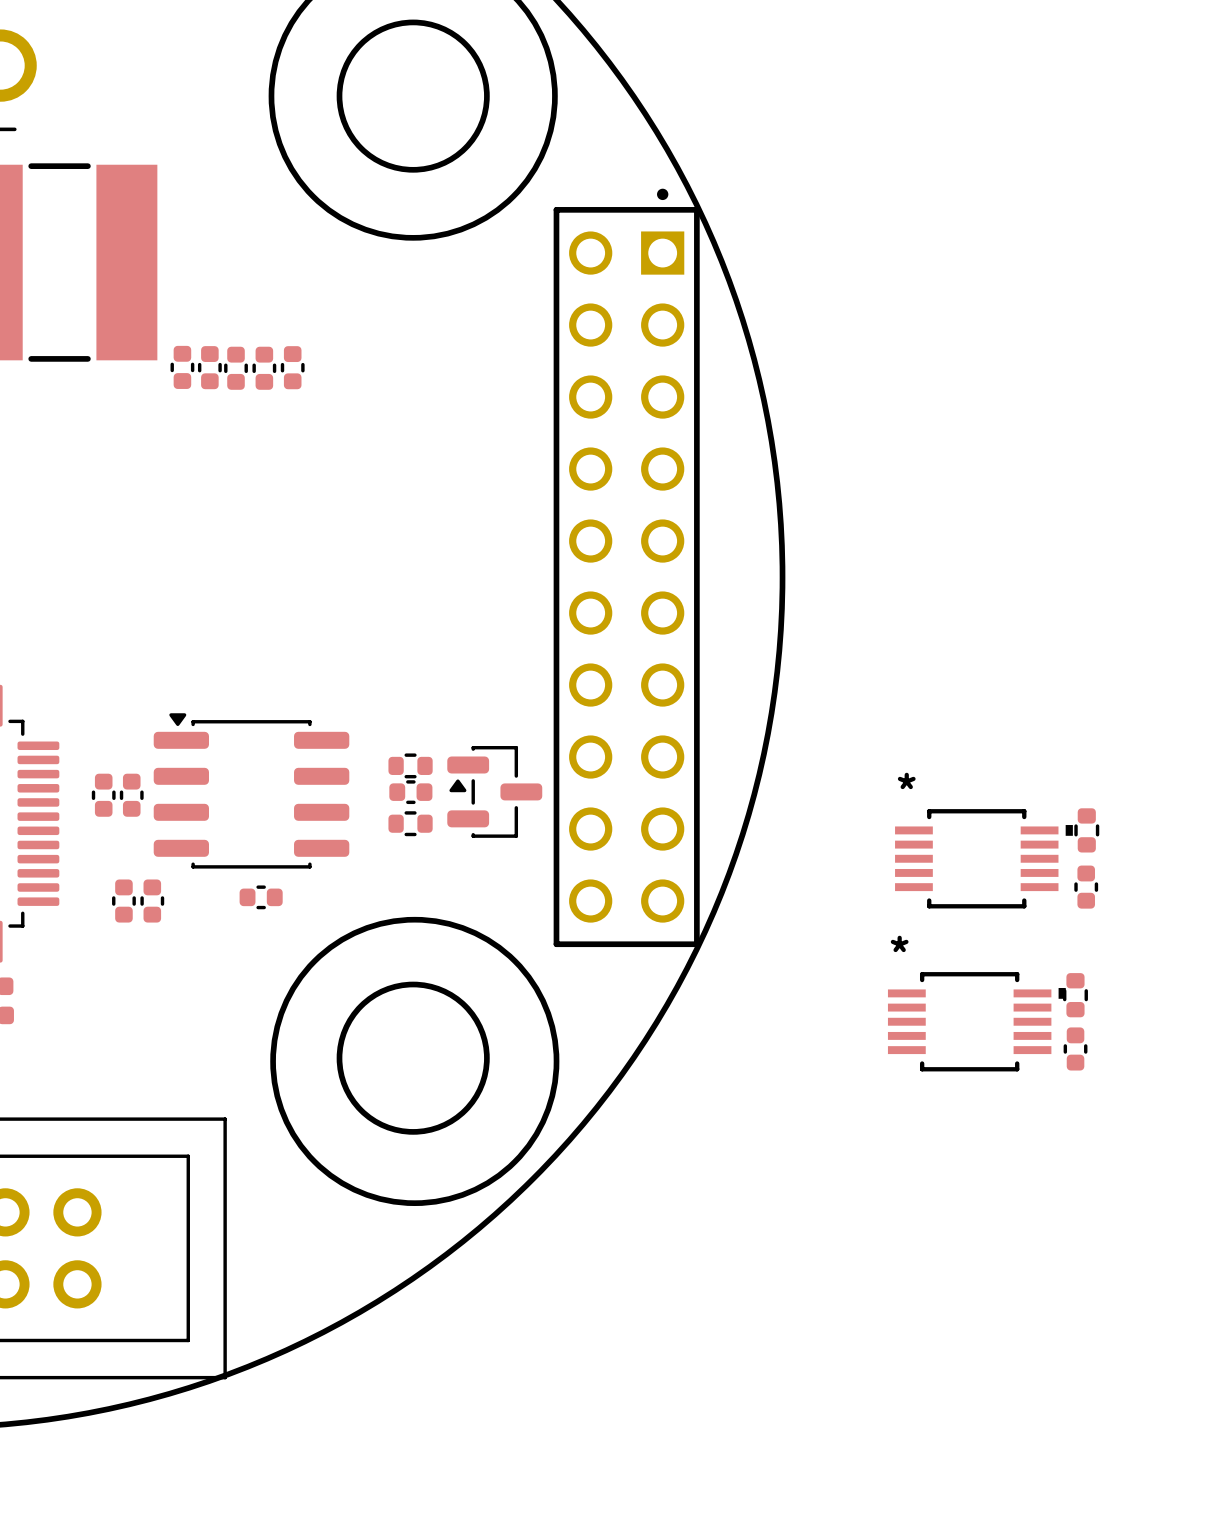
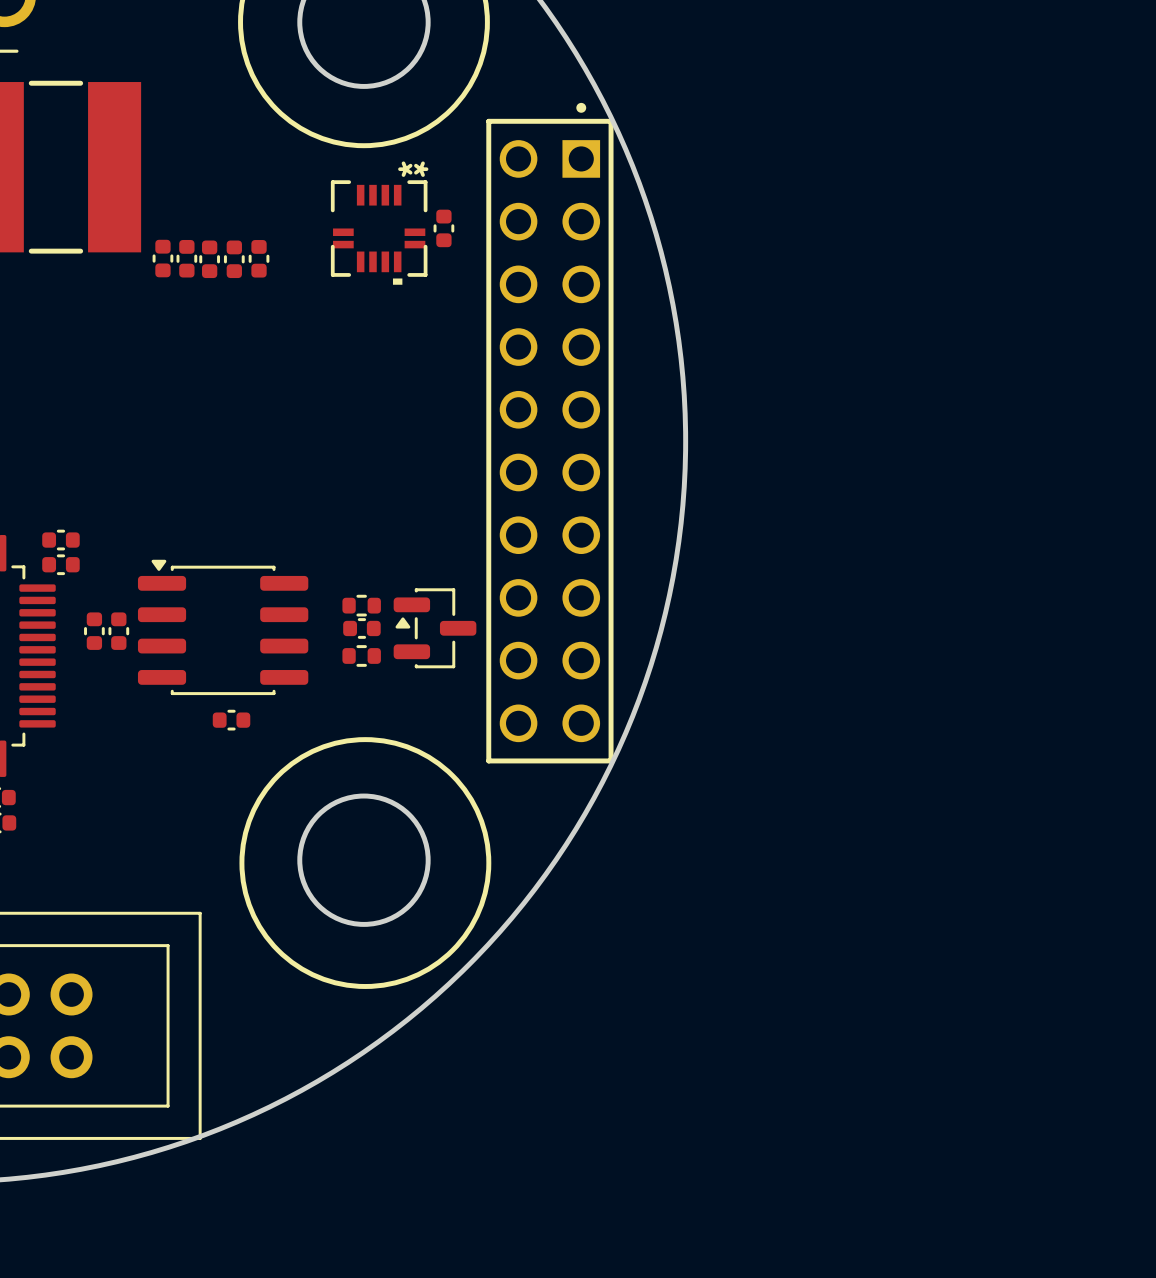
part: none -> (443, 228)
part: none -> (379, 232)
part: none -> (60, 540)
part: none -> (60, 564)
part: (1086, 830) -> none
part: (983, 858) -> none
part: (1086, 887) -> none
part: (123, 901) -> none
part: (152, 901) -> none
part: (1075, 995) -> none
part: (976, 1021) -> none
part: (1075, 1048) -> none

